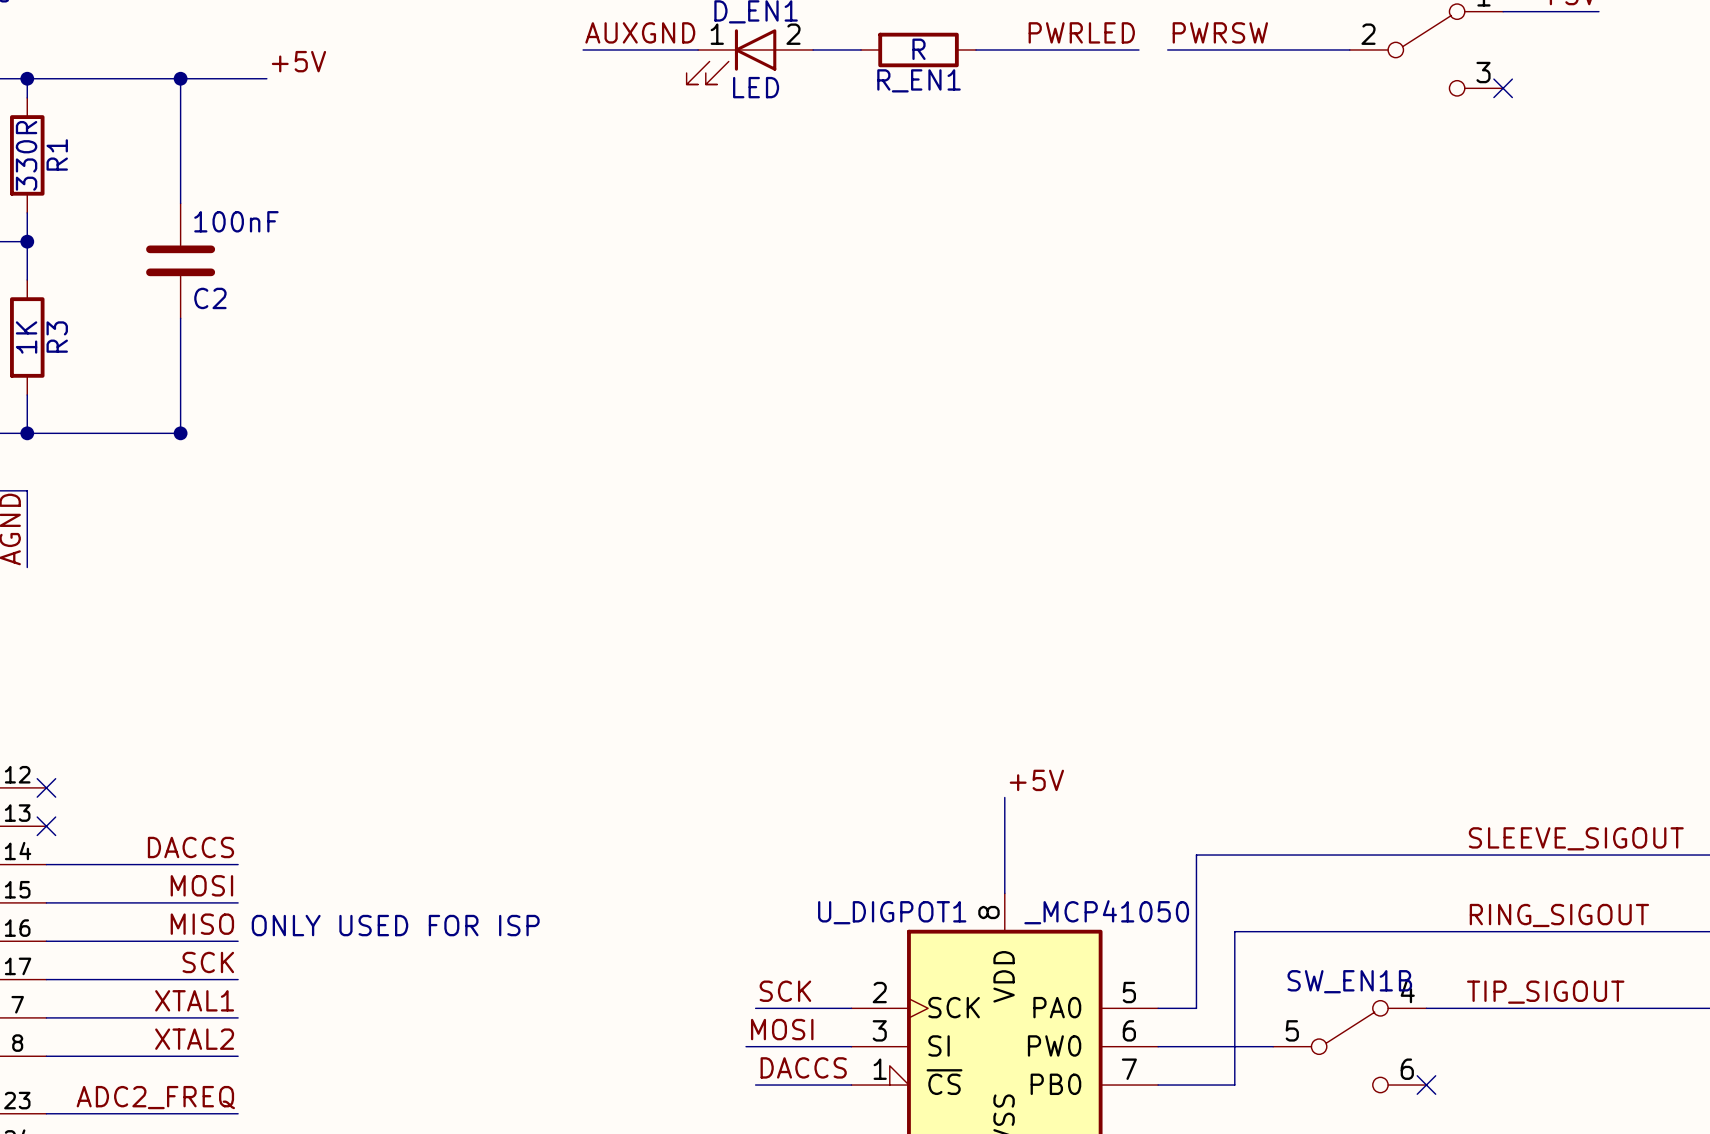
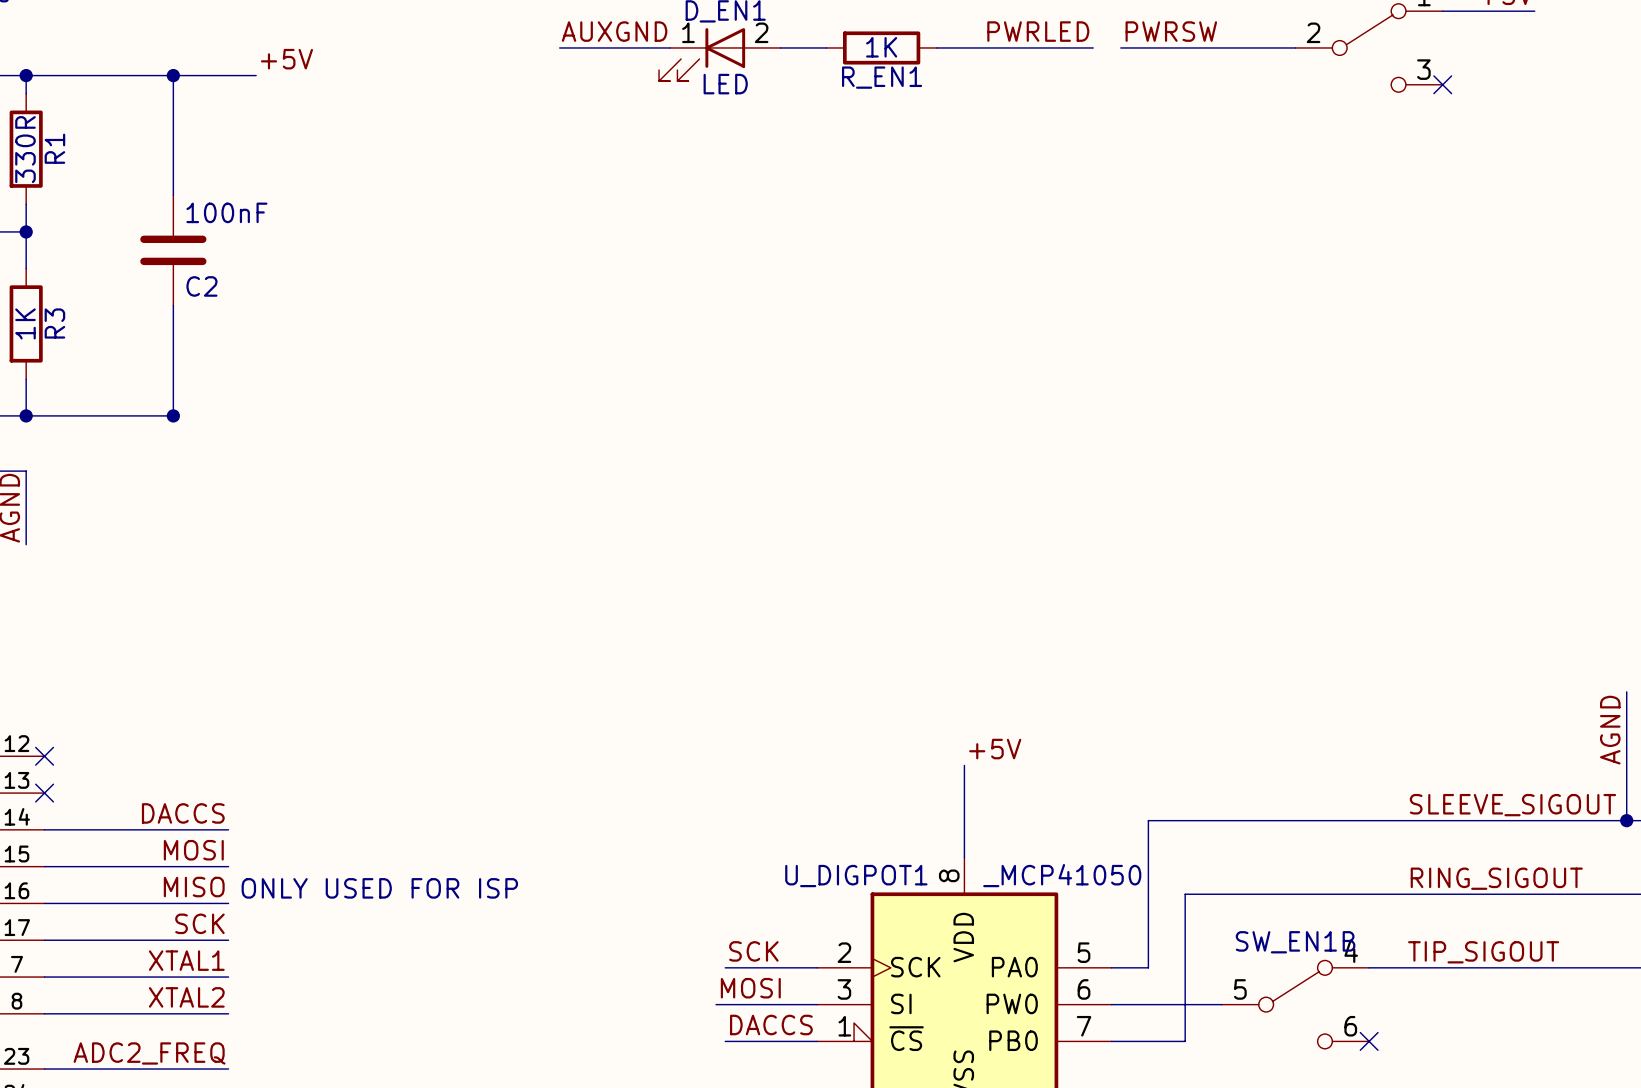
R_EN1 value: R (918, 49) -> 1K (881, 47)
wire: none -> (1626, 691) (1626, 820)
label: none -> AGND (1610, 730)
junction: none -> (1626, 820)

